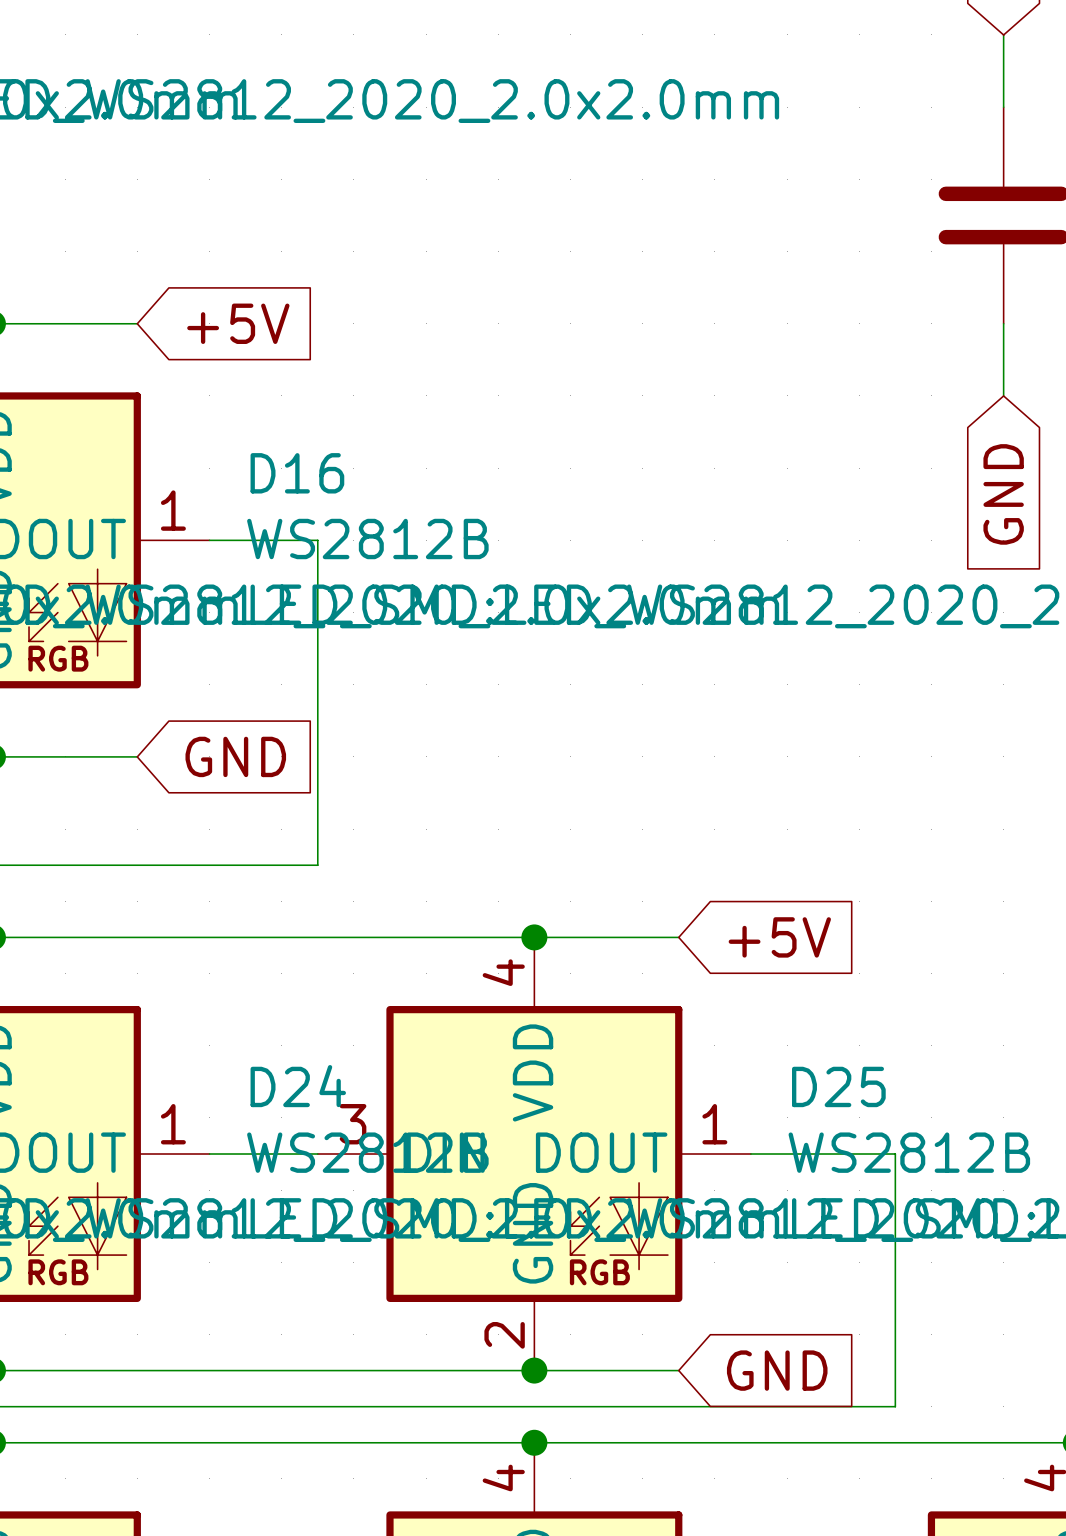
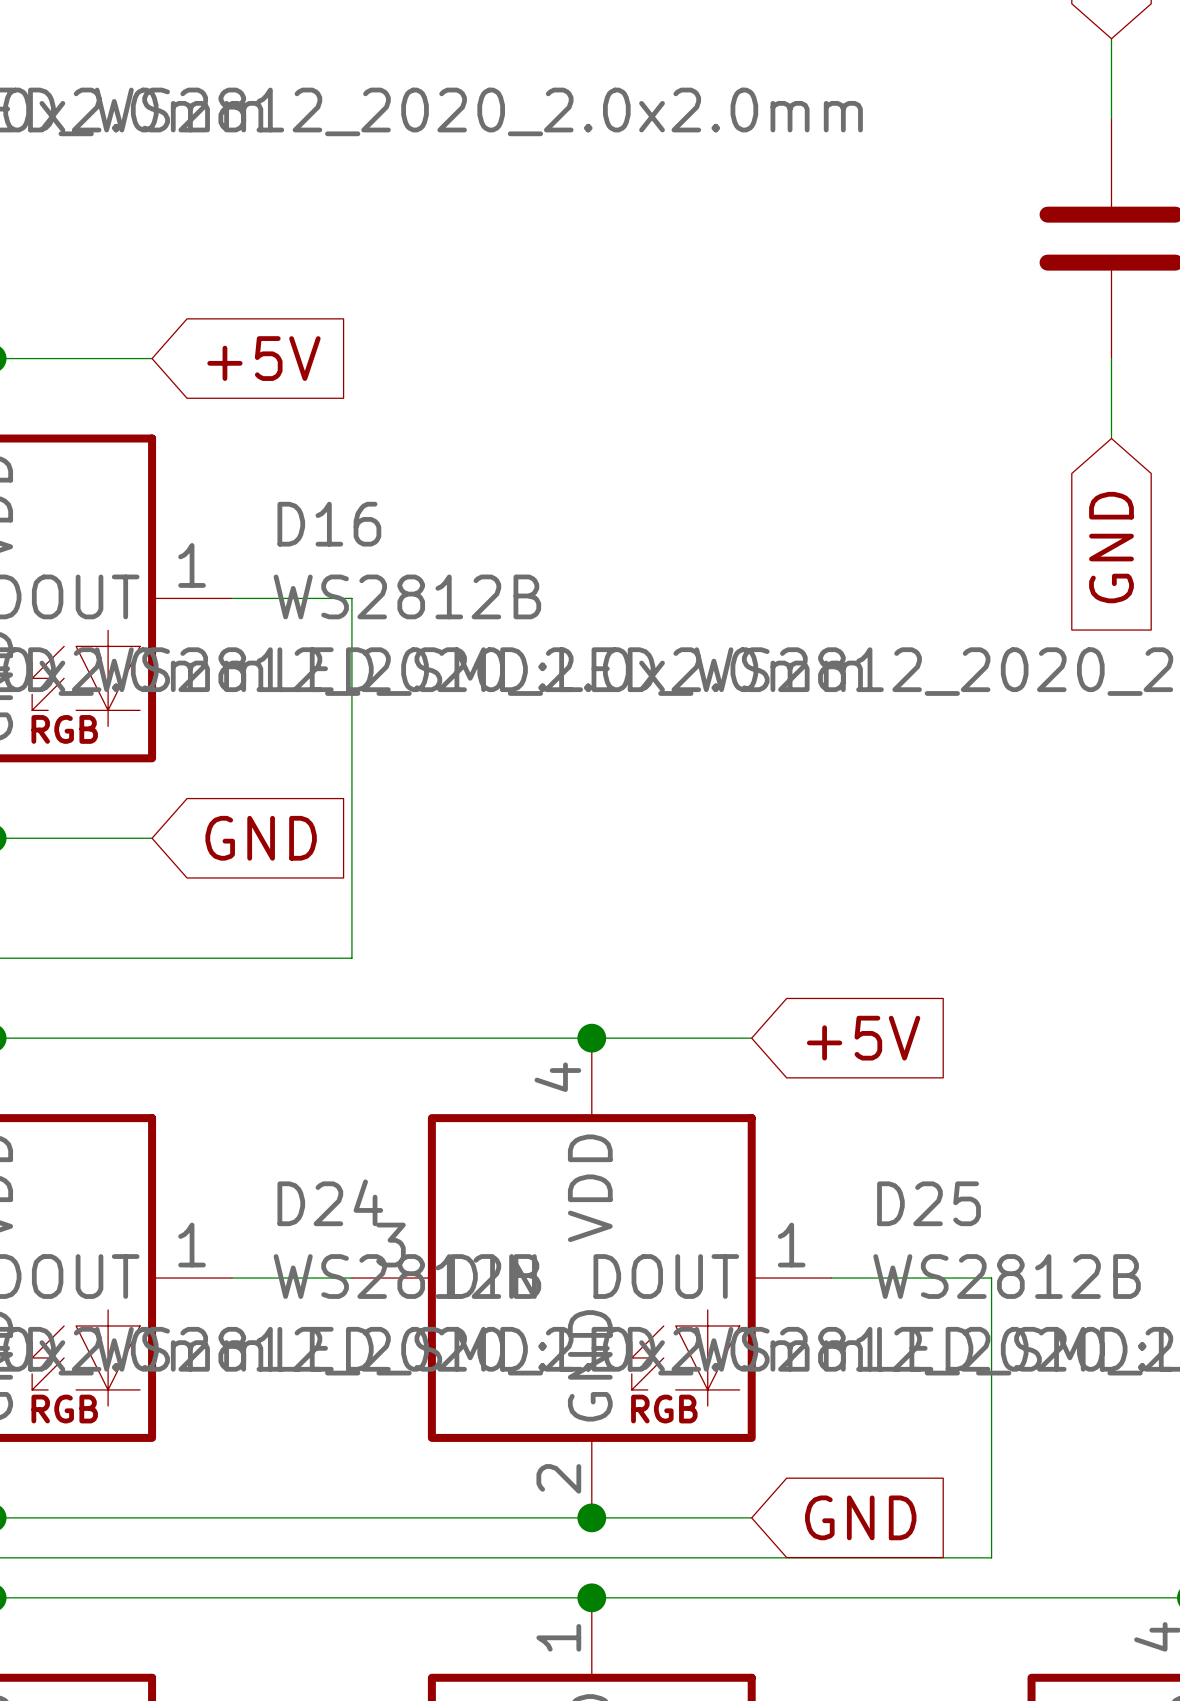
part pin number: 4 (503, 1478) -> 1 (558, 1637)

